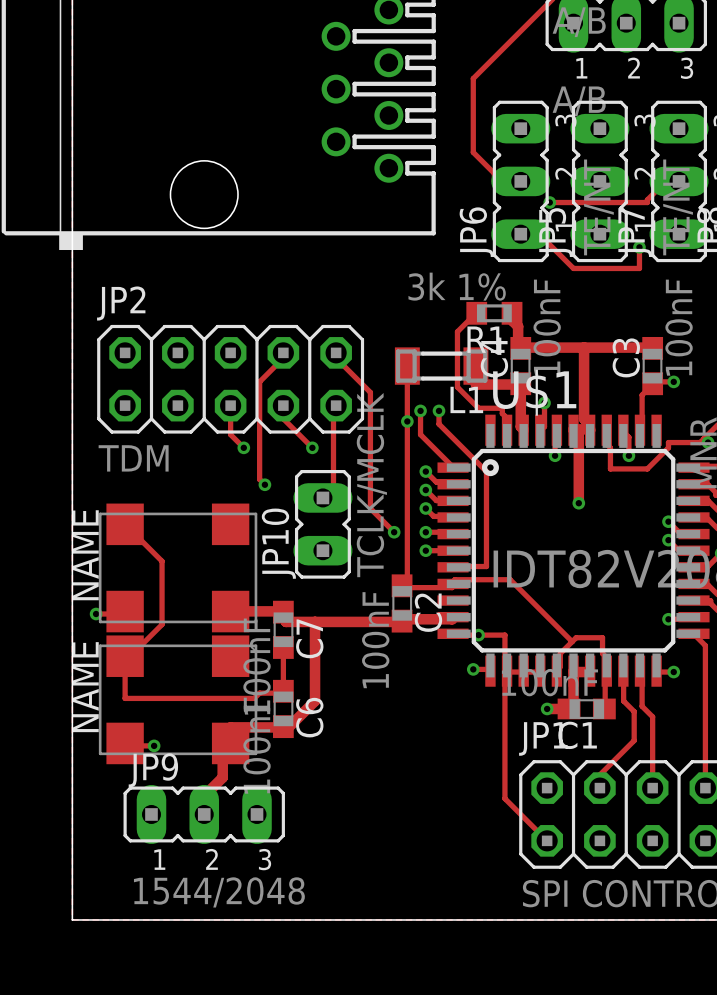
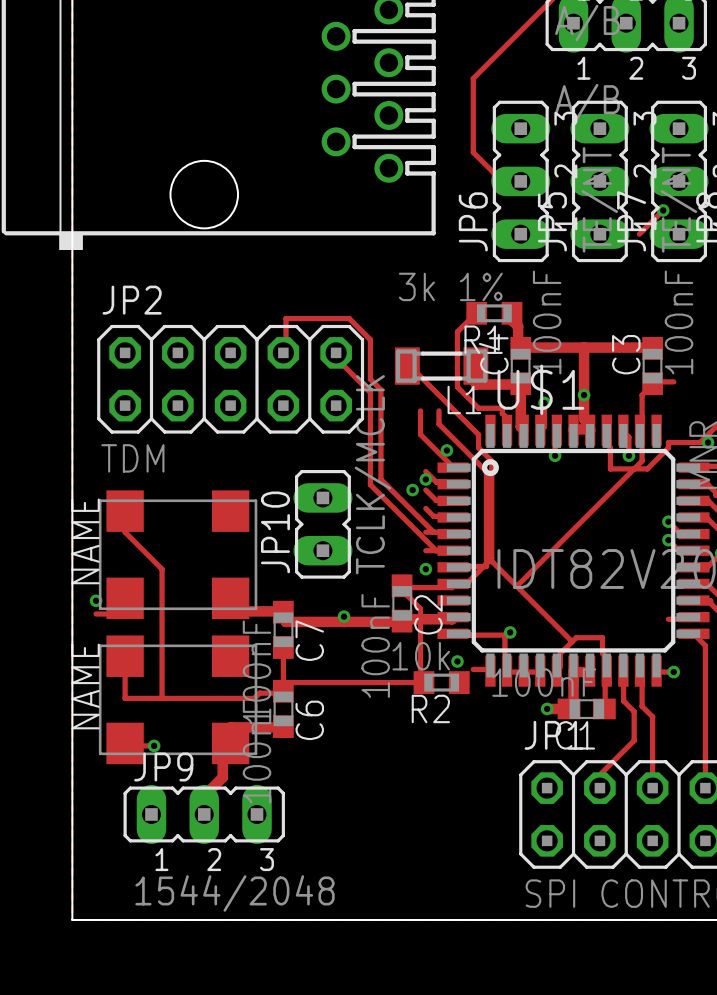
track: (679, 181) (665, 181) (647, 199) (647, 202) (549, 202) -> none
via: (549, 202) -> none
track: none -> (663, 210) (639, 234)
track: (520, 234) (547, 234) (547, 242) (573, 268) (639, 268) (639, 247) -> none
via position: (639, 247) -> (663, 210)
track: (283, 352) (283, 358) (259, 381) (259, 479) (264, 484) -> (283, 352) (286, 350) (286, 318) (349, 318) (370, 339) (370, 379) (380, 389) (380, 479) (433, 532)
track: (407, 366) (407, 587) -> (407, 366) (409, 366) (478, 434) (478, 447) (491, 461) (491, 558) (468, 582) (454, 582)
via: (673, 381) -> none
via: none -> (584, 395)
track: (230, 405) (230, 434) (243, 447) -> none
track: (283, 405) (283, 418) (312, 447) -> none
track: (336, 405) (333, 408) (333, 487) (322, 497) -> none
via: (420, 410) -> none
via: (439, 410) -> none
via: (407, 421) -> none
track: (573, 430) (578, 437) (578, 503) -> none
track: none -> (639, 430) (642, 432) (642, 461) (516, 586)
via: (243, 447) -> none
via: (312, 447) -> none
via: none -> (446, 450)
via: (425, 471) -> none
via: none -> (425, 479)
via: (264, 484) -> none
track: (370, 484) (370, 508) (394, 532) -> (370, 484) (436, 550)
via: none -> (412, 490)
via: (425, 490) -> none
via: (578, 503) -> none
via: (425, 508) -> none
track: (125, 524) (162, 561) (162, 569) -> (125, 511) (125, 532) (162, 569)
via: (394, 532) -> none
via: (425, 532) -> none
via: (425, 550) -> none
part position: (178, 567) -> (178, 554)
via: none -> (425, 569)
track: (510, 579) (454, 579) (454, 582) -> (510, 579) (490, 559)
track: none -> (407, 587) (407, 595) (420, 608) (420, 682)
via position: (96, 614) -> (96, 600)
via: none -> (344, 616)
via: (668, 619) -> none
track: (315, 621) (315, 701) (286, 730) (283, 726) -> none
track: (162, 624) (125, 661) -> (162, 624) (162, 698)
via: none -> (510, 632)
via: (478, 635) -> none
via: none -> (457, 661)
via: (473, 669) -> none
track: (507, 671) (504, 672) (504, 798) (547, 840) -> none
track: none -> (283, 682) (423, 682)
R2: none -> 10k (441, 682)

